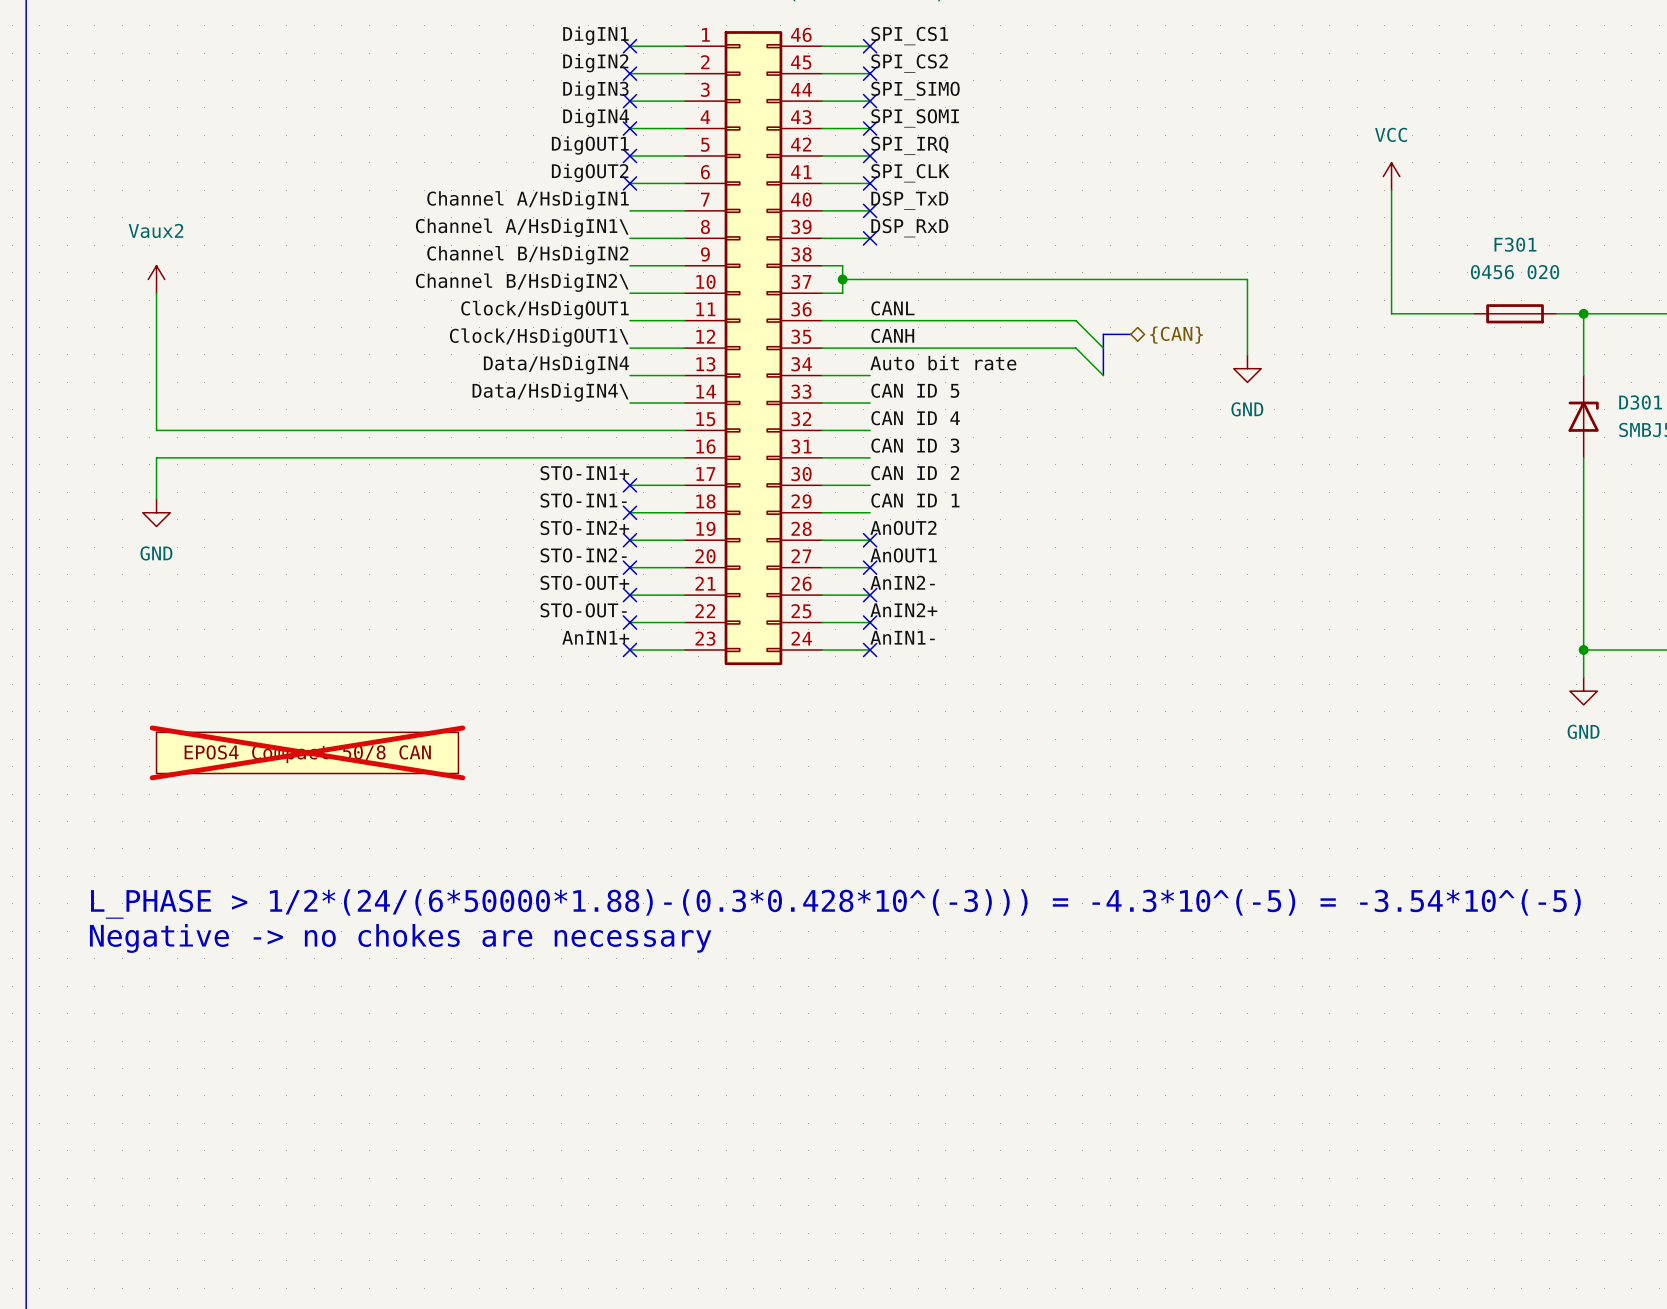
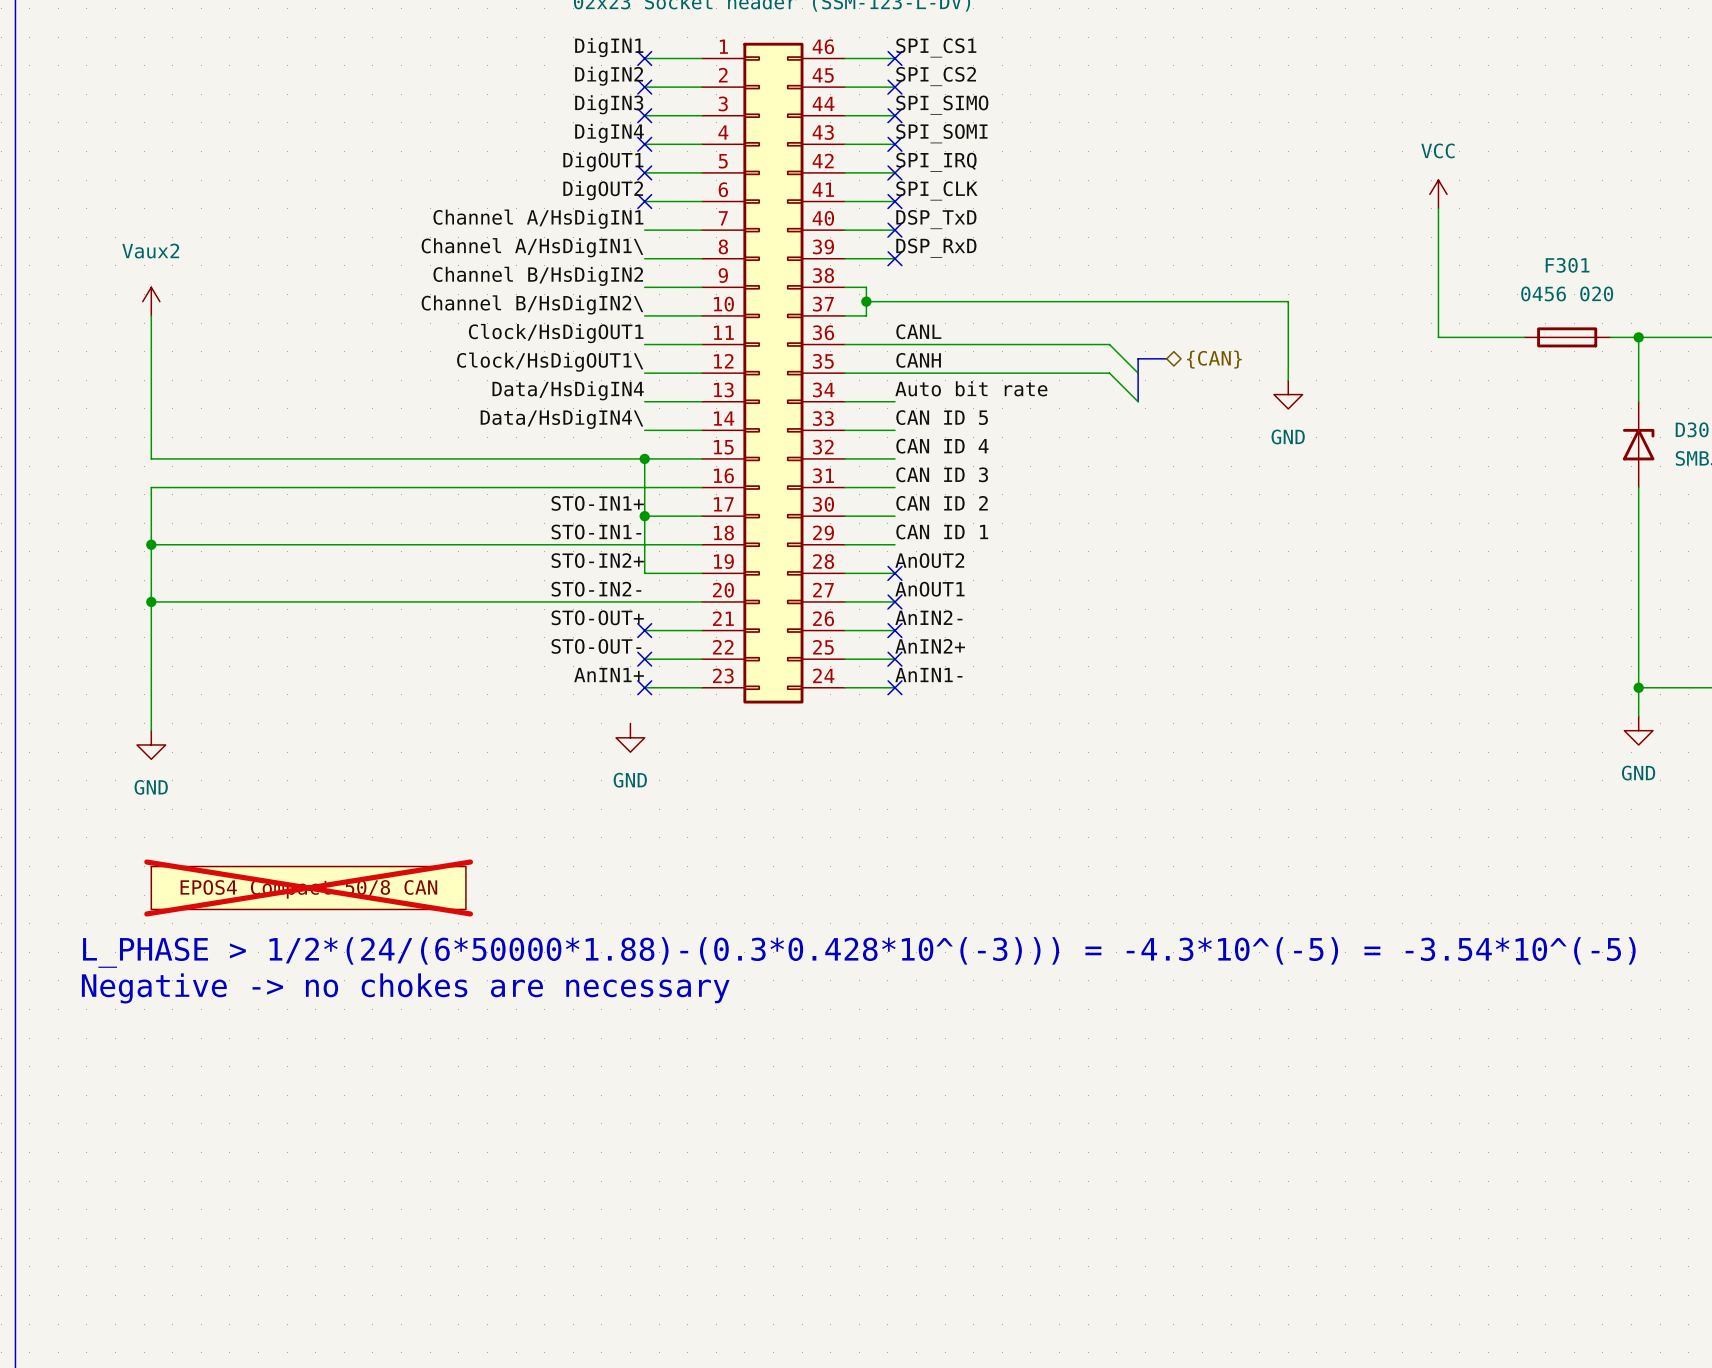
wire: none -> (644, 458) (644, 573)
junction: none -> (644, 458)
no-connect mark: (629, 485) -> none
junction: none -> (644, 516)
wire: none -> (151, 530) (151, 730)
wire: none -> (151, 544) (644, 544)
power symbol position: GND (156, 512) -> GND (151, 744)
junction: none -> (151, 544)
no-connect mark: (629, 512) -> none
no-connect mark: (629, 540) -> none
wire: none -> (151, 601) (644, 601)
junction: none -> (151, 601)
no-connect mark: (629, 567) -> none
power symbol: none -> GND (630, 737)
part position: (307, 752) -> (308, 887)

